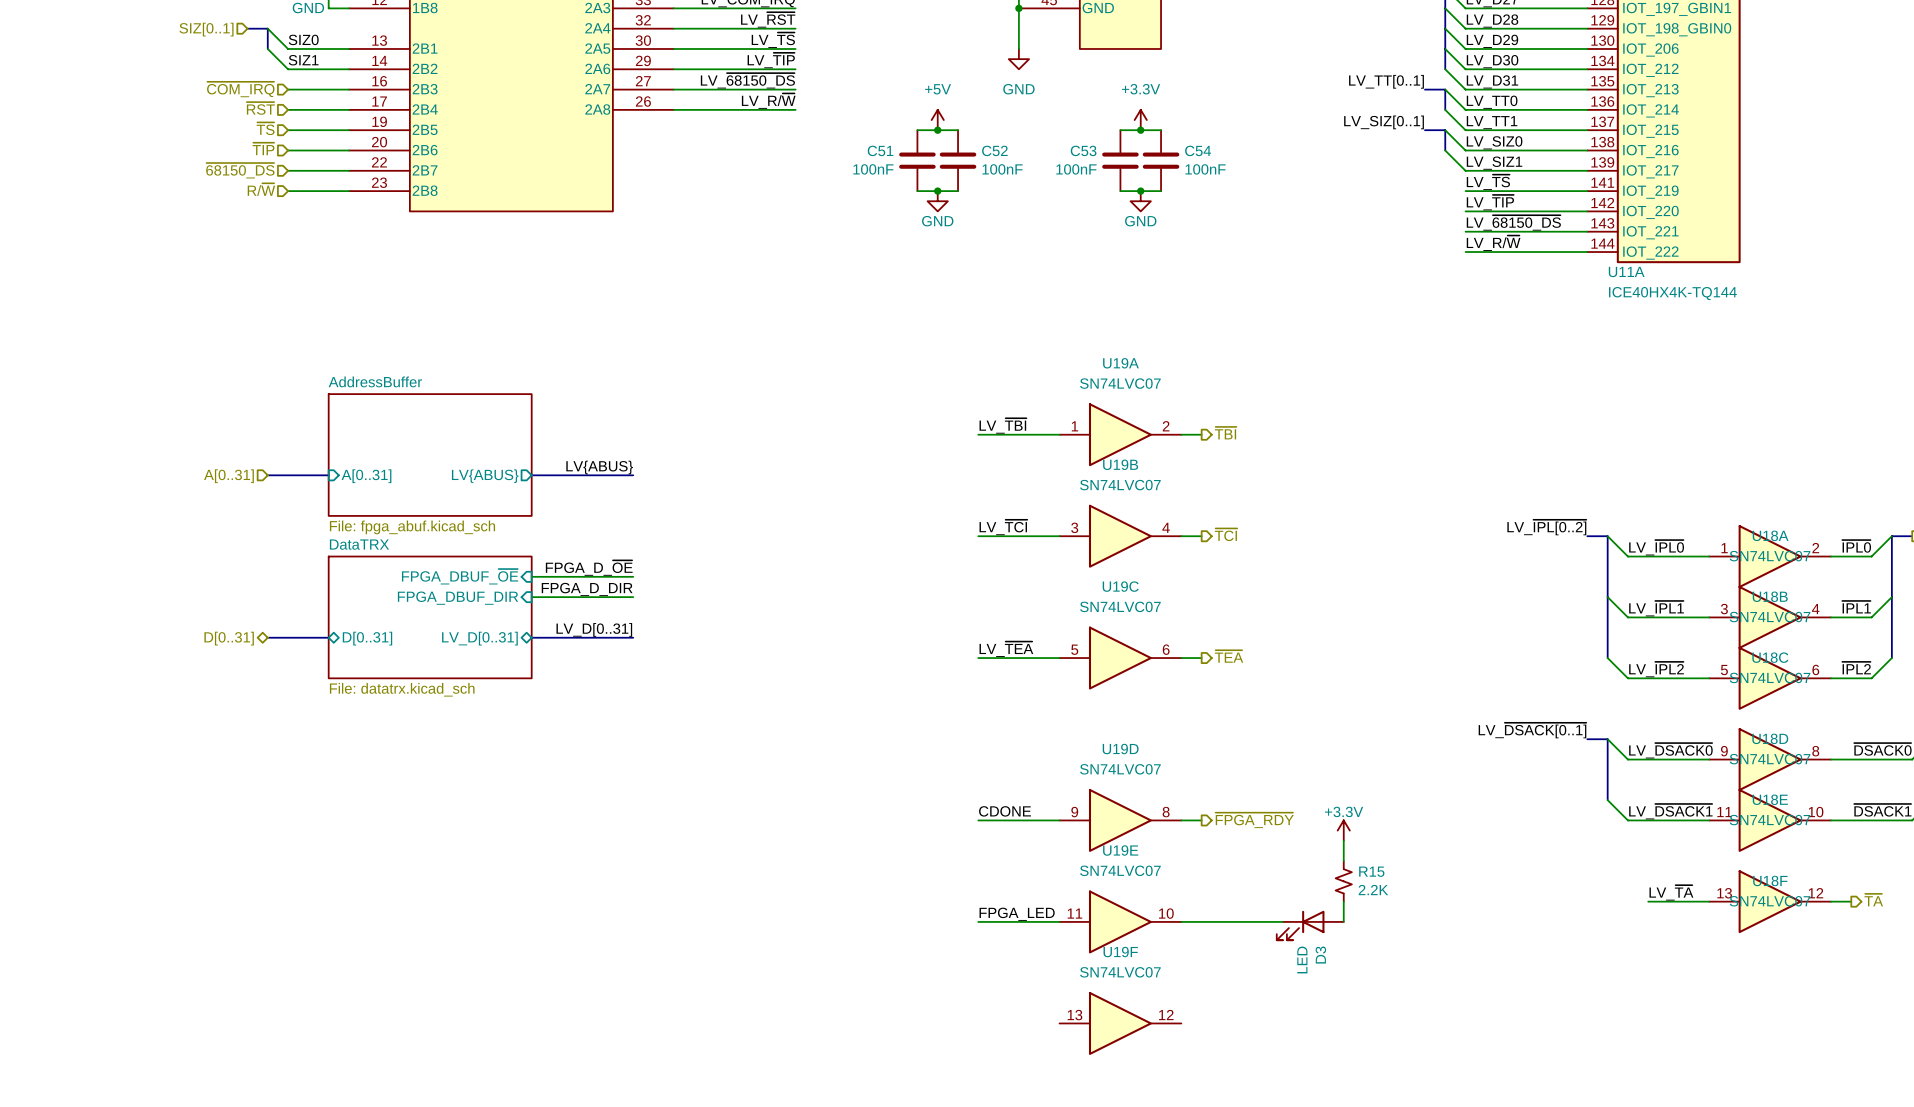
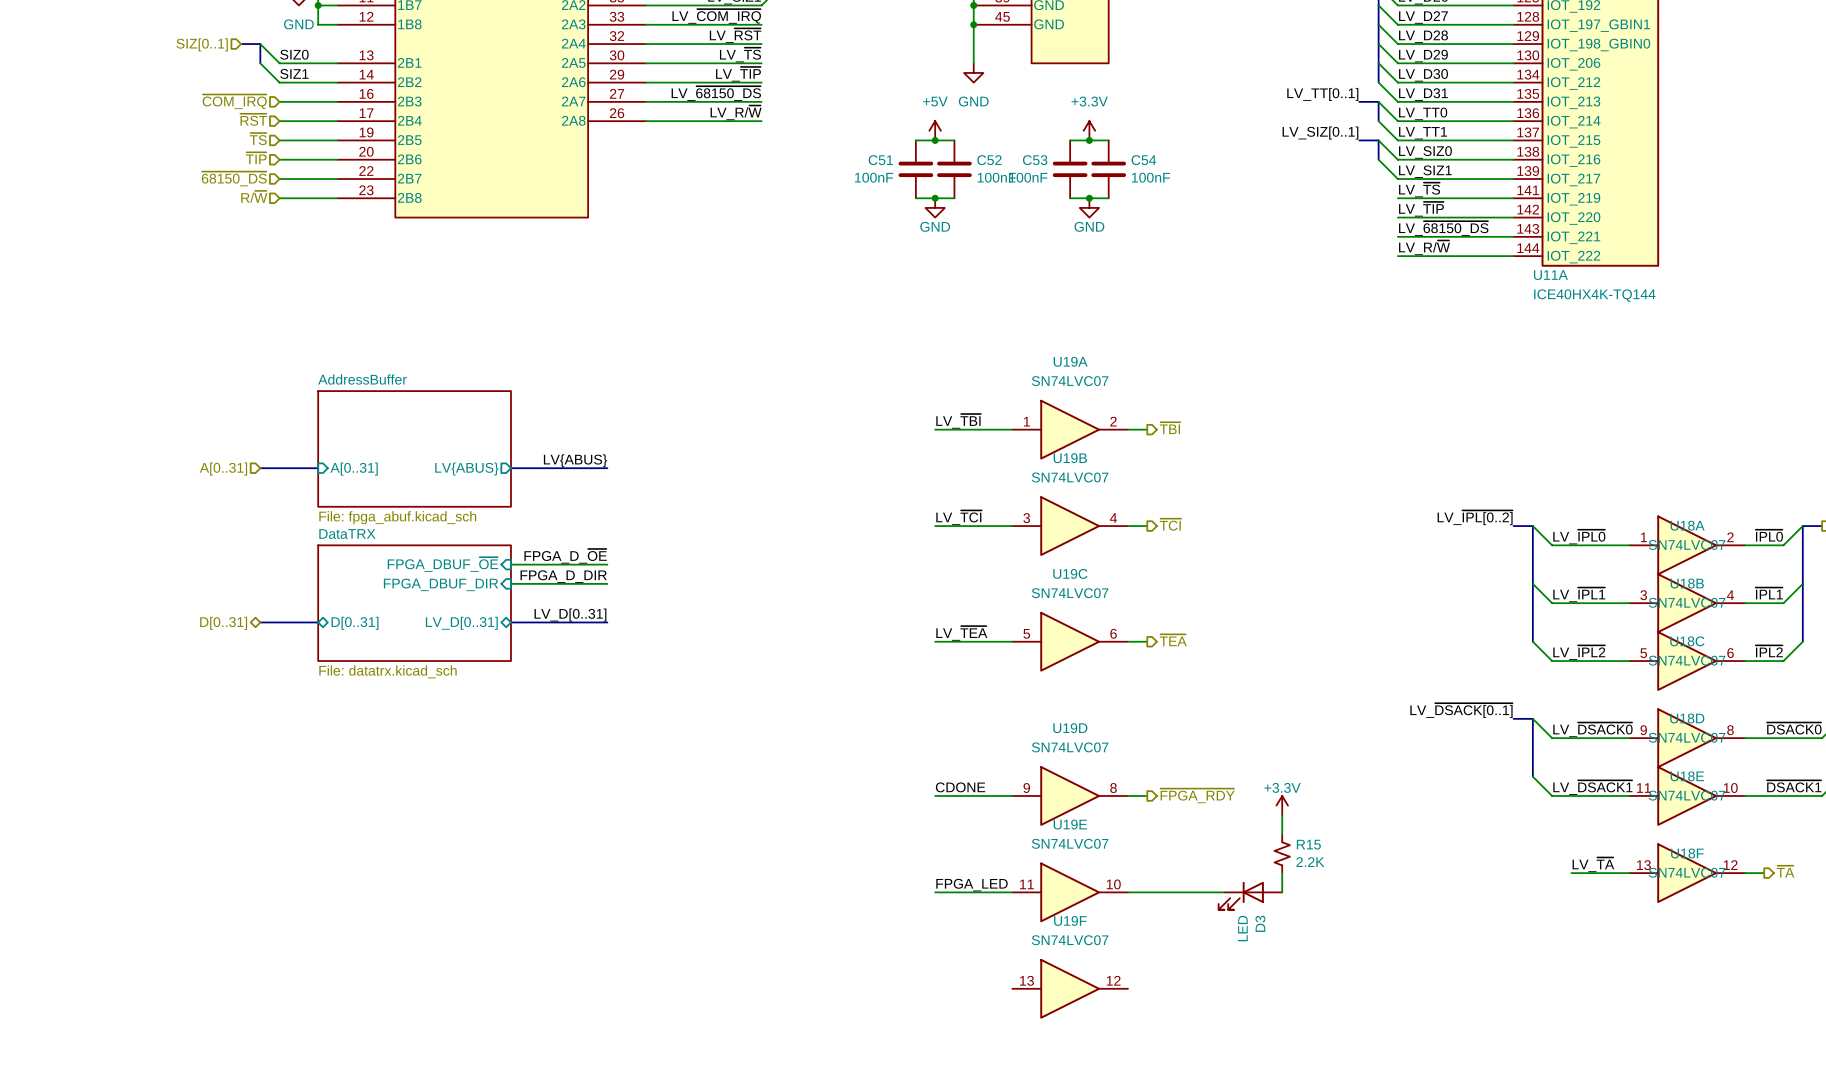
power symbol position: +5V (937, 120) -> +5V (935, 130)
wire: (917, 130) (958, 130) -> (954, 140) (915, 140)
junction: (937, 130) -> none
junction: none -> (935, 140)
C52 name: C52 (994, 150) -> C51 (880, 160)
C51: 100nF (917, 160) -> none
C52: none -> 100nF (954, 169)
C52 value position: 100nF (1002, 169) -> 100nF (874, 177)
wire: (917, 191) (958, 191) -> (954, 198) (915, 198)
junction: (937, 191) -> none
junction: none -> (935, 198)
power symbol position: GND (937, 201) -> GND (935, 207)

